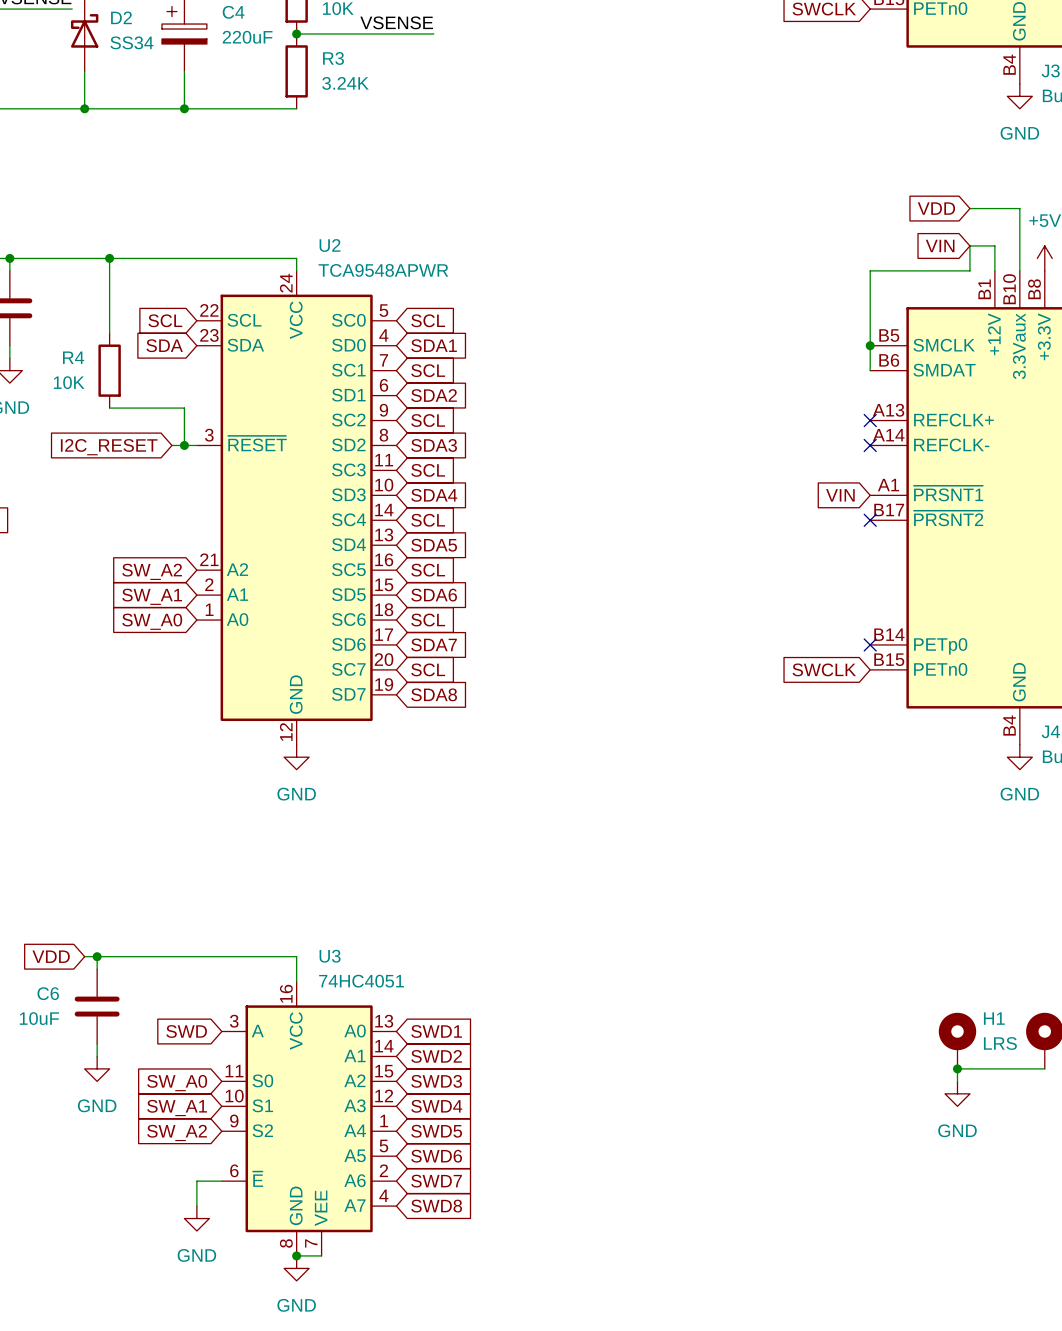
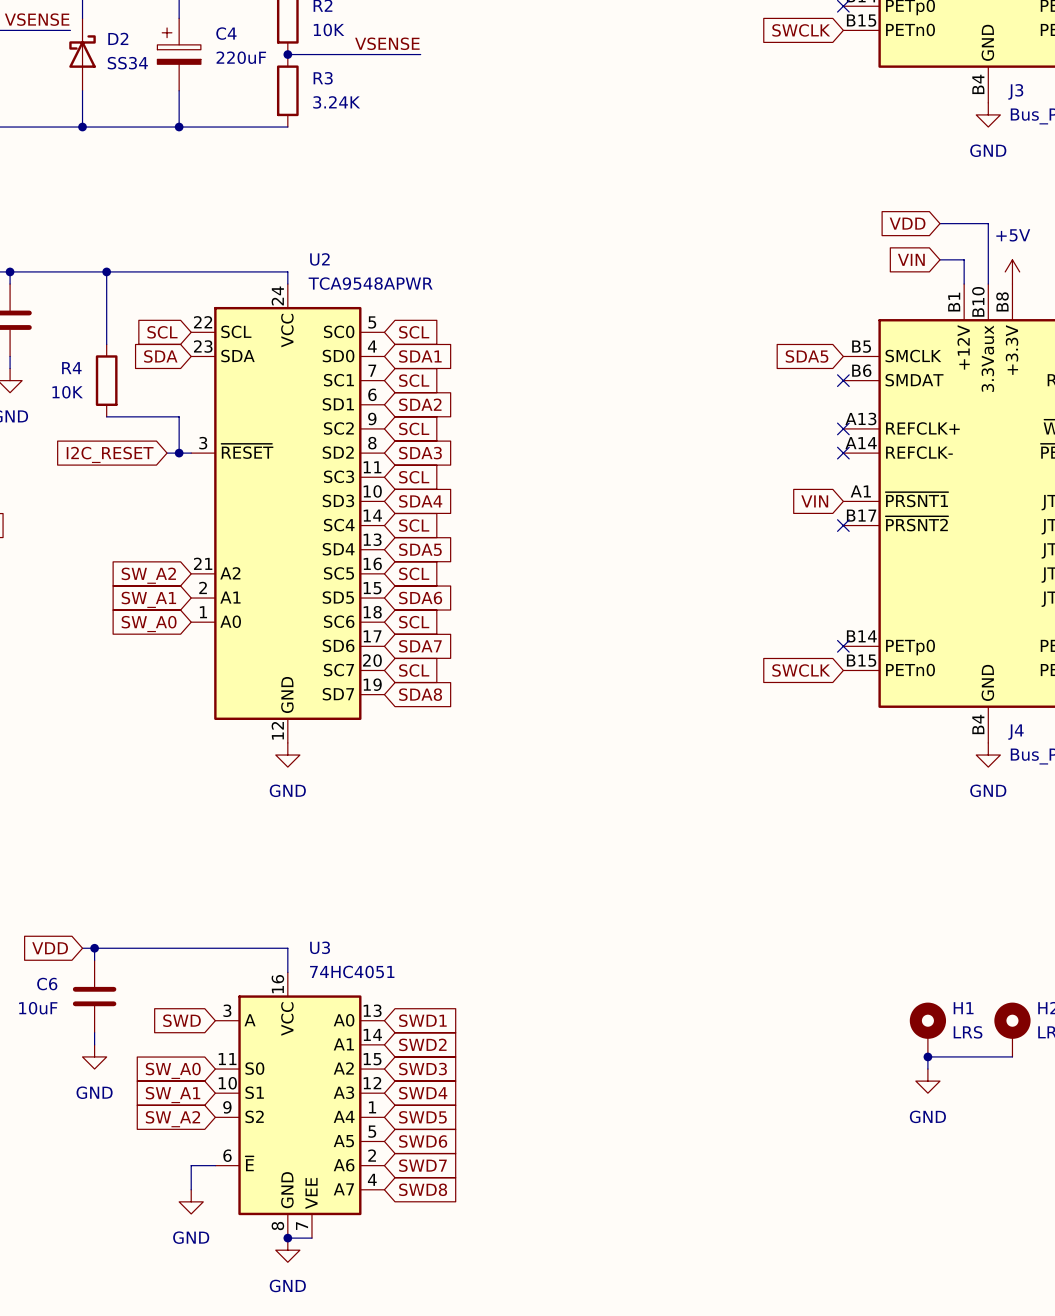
wire: (969, 245) (969, 270) (870, 270) (870, 370) -> none
global label: none -> SDA5 (807, 356)
junction: (870, 345) -> none
no-connect mark: none -> (843, 380)

